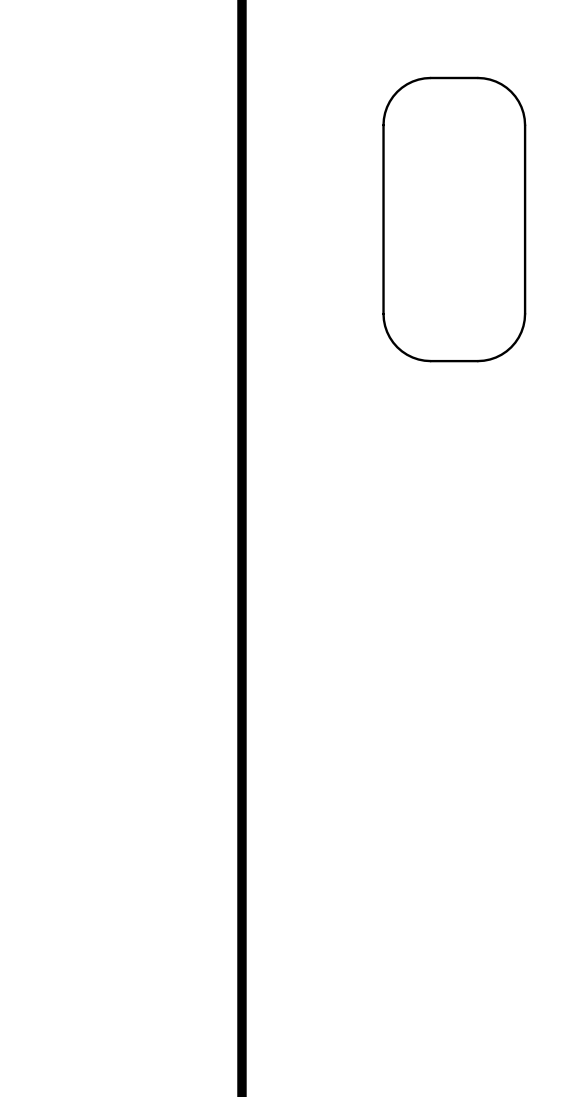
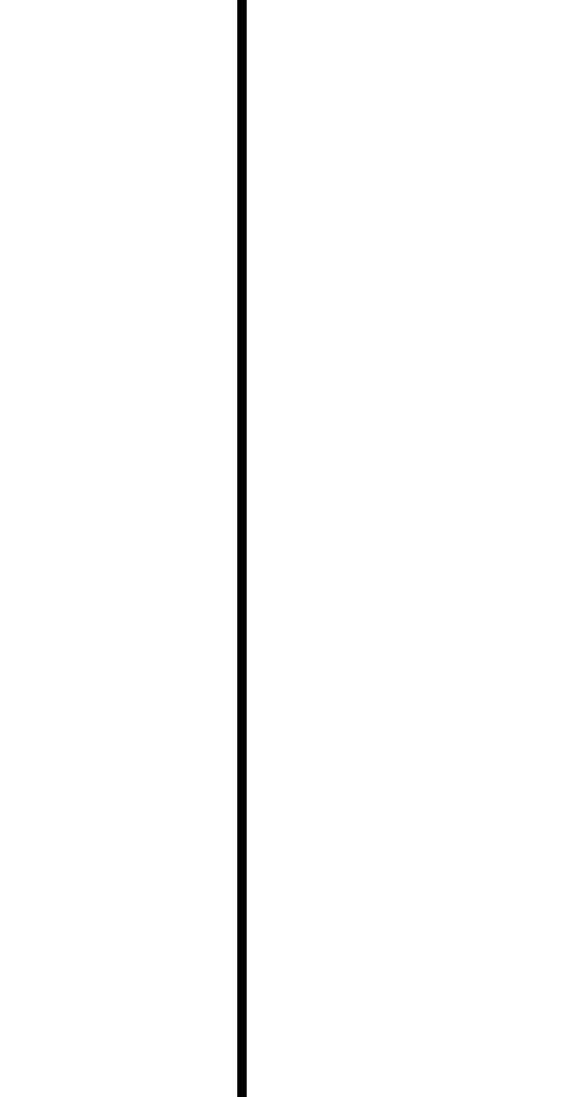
board edge: (430, 77) (477, 77) (495, 81) (506, 87) (515, 96) (523, 112) (525, 125) (524, 320) (521, 331) (511, 347) (501, 354) (490, 359) (477, 361) (418, 359) (407, 354) (397, 347) (389, 337) (385, 326) (383, 313) (383, 119) (389, 101) (401, 87) (418, 79) (430, 77) -> none

